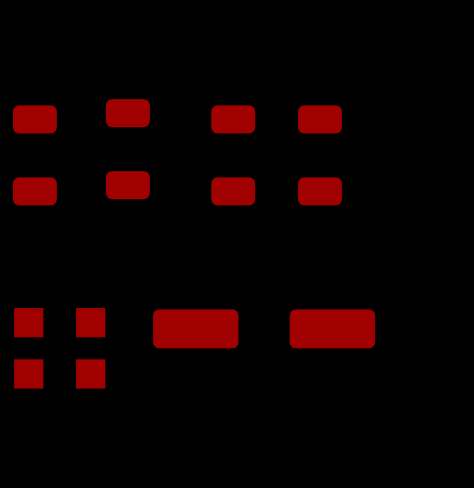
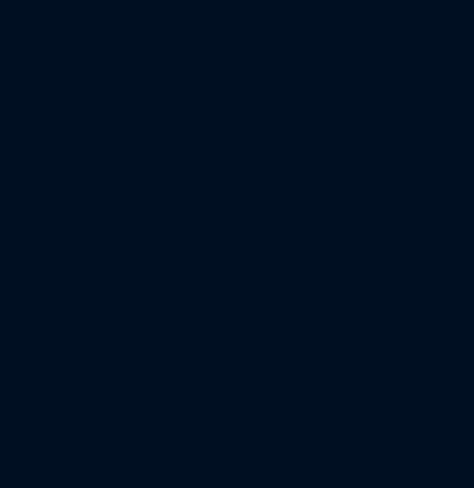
part: (127, 149) -> none
part: (34, 155) -> none
part: (233, 155) -> none
part: (319, 155) -> none
part: (264, 328) -> none
part: (28, 348) -> none
part: (90, 348) -> none

